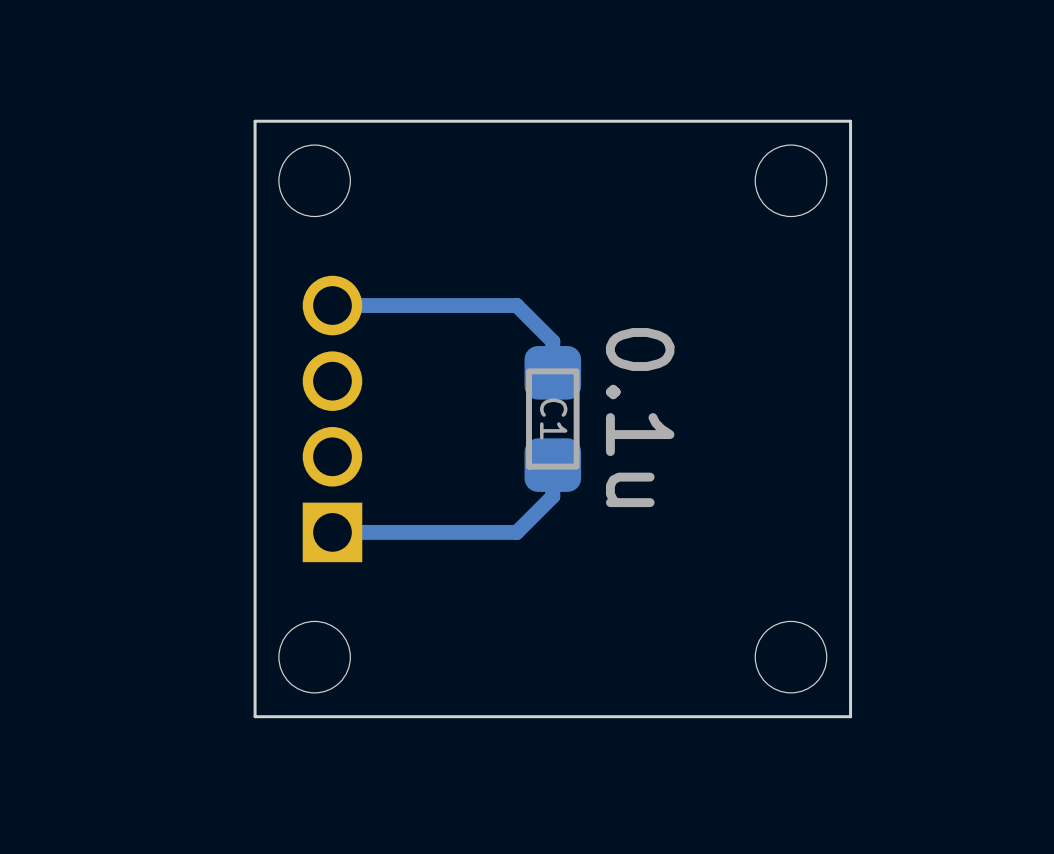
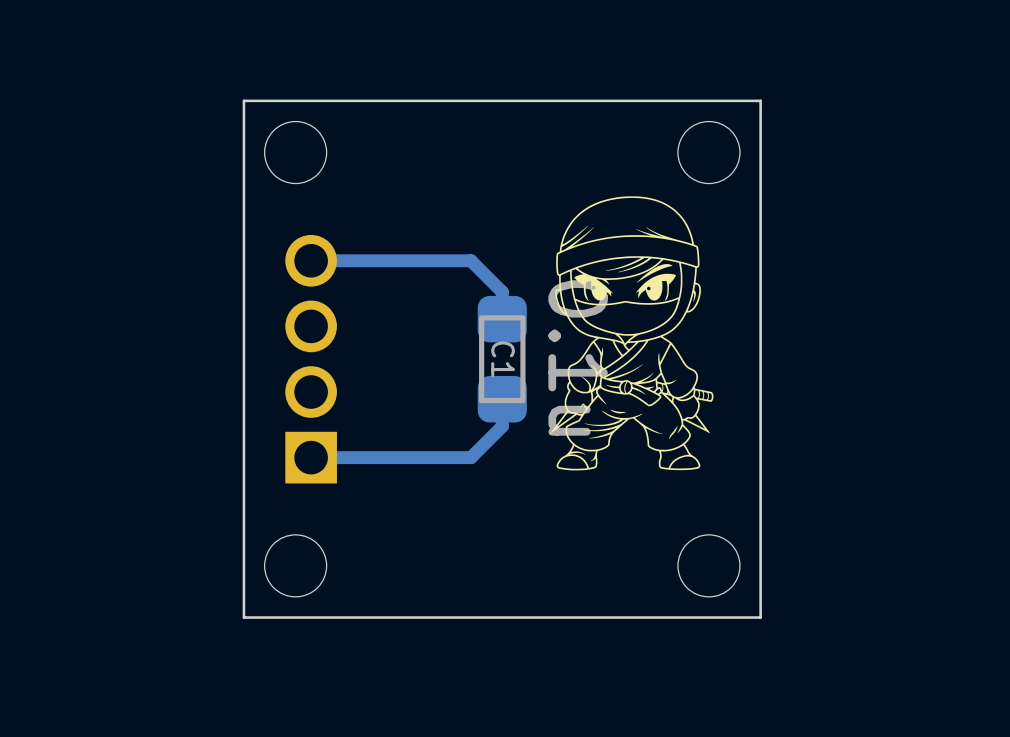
drawing: none -> [549, 196, 714, 471]

